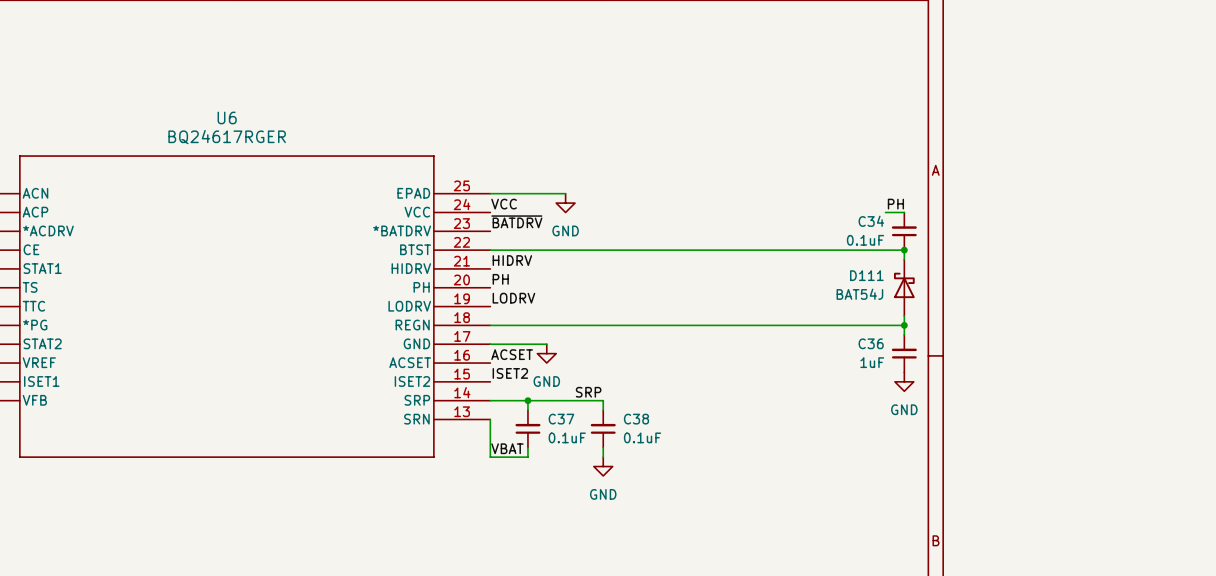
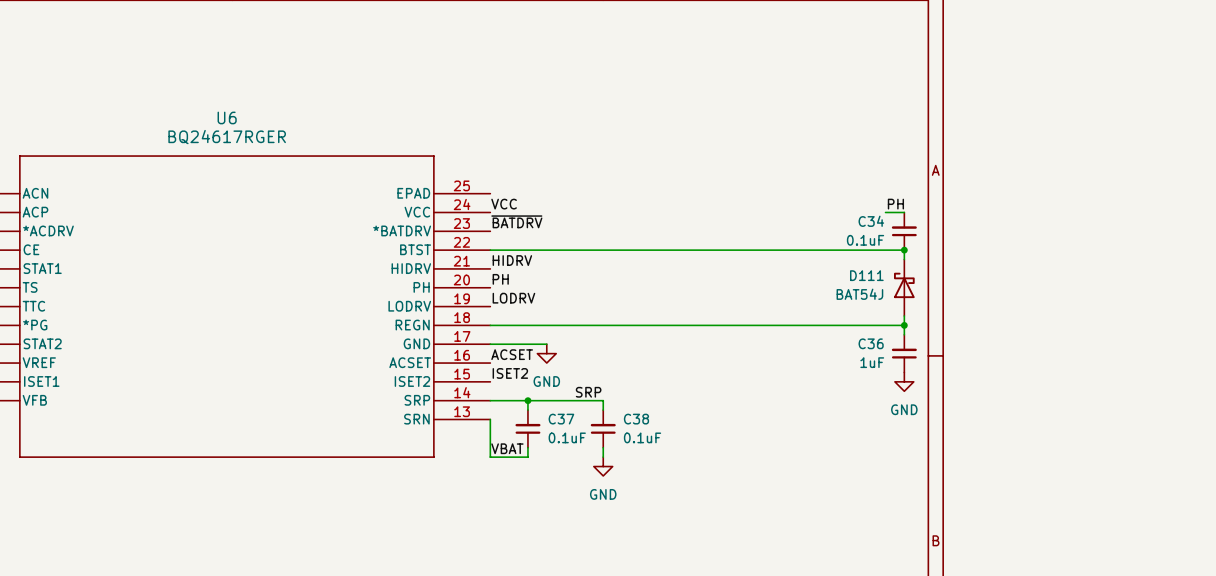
wire: (490, 193) (565, 193) -> none
power symbol: GND (565, 203) -> none

